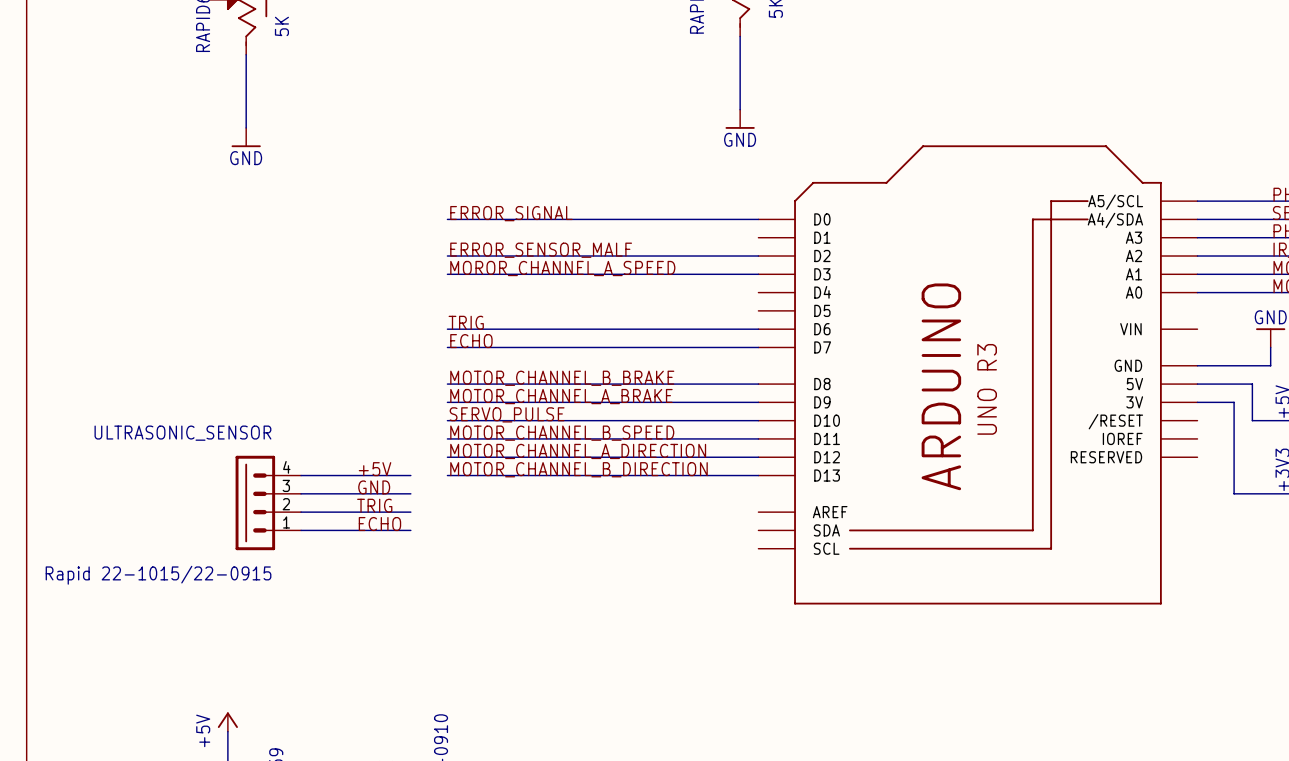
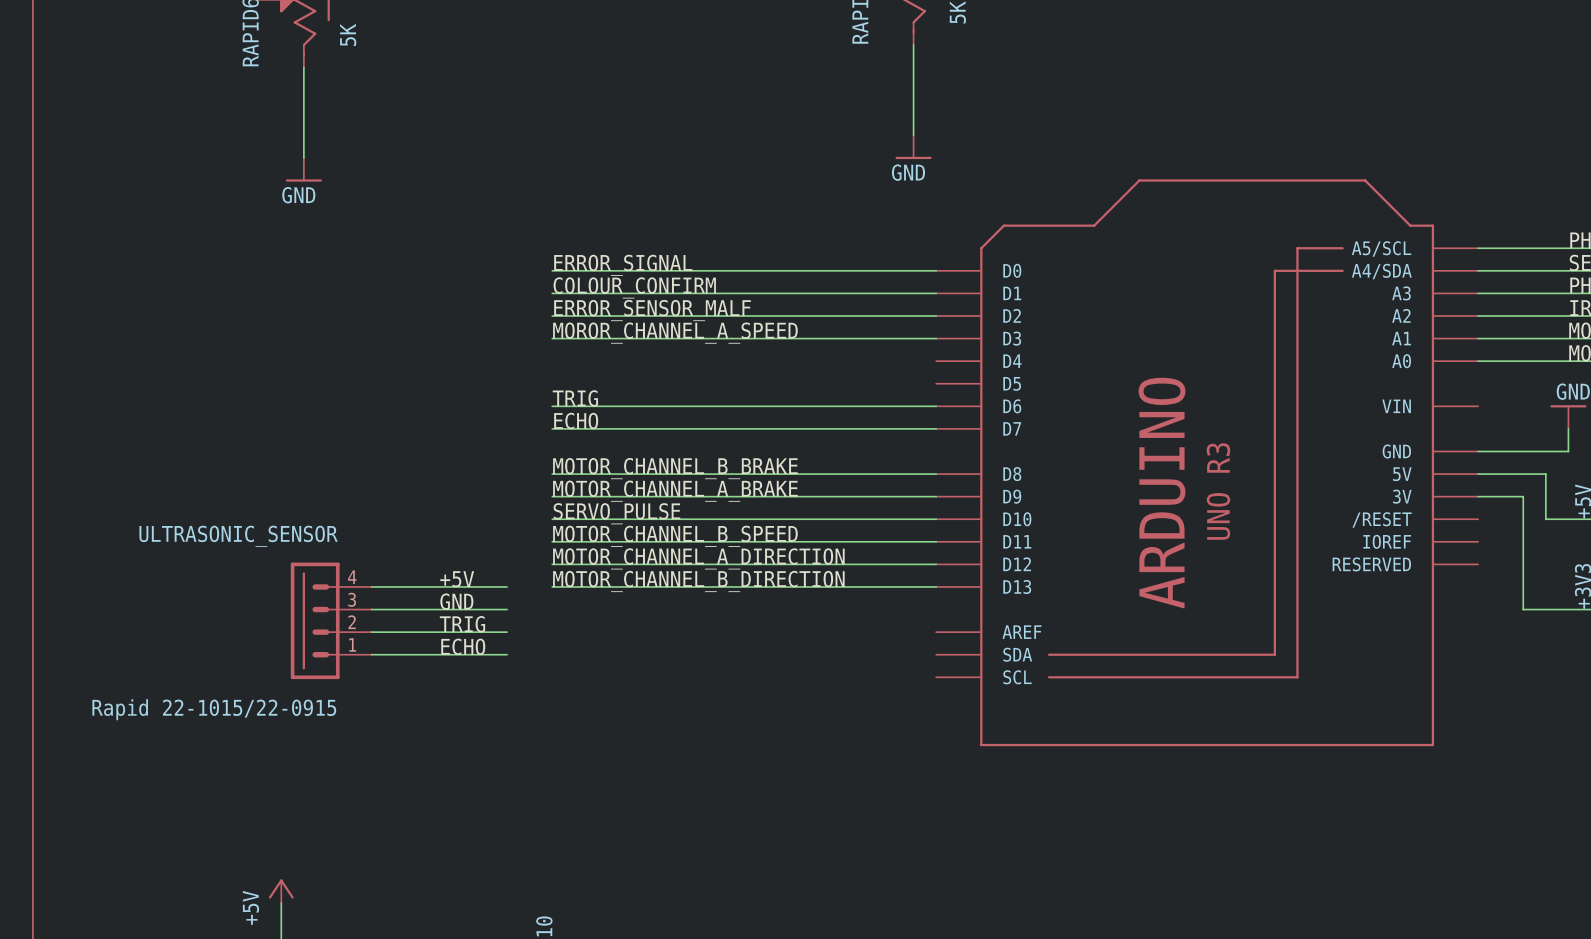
label: none -> COLOUR_CONFIRM (634, 287)
wire: none -> (552, 293) (936, 293)

